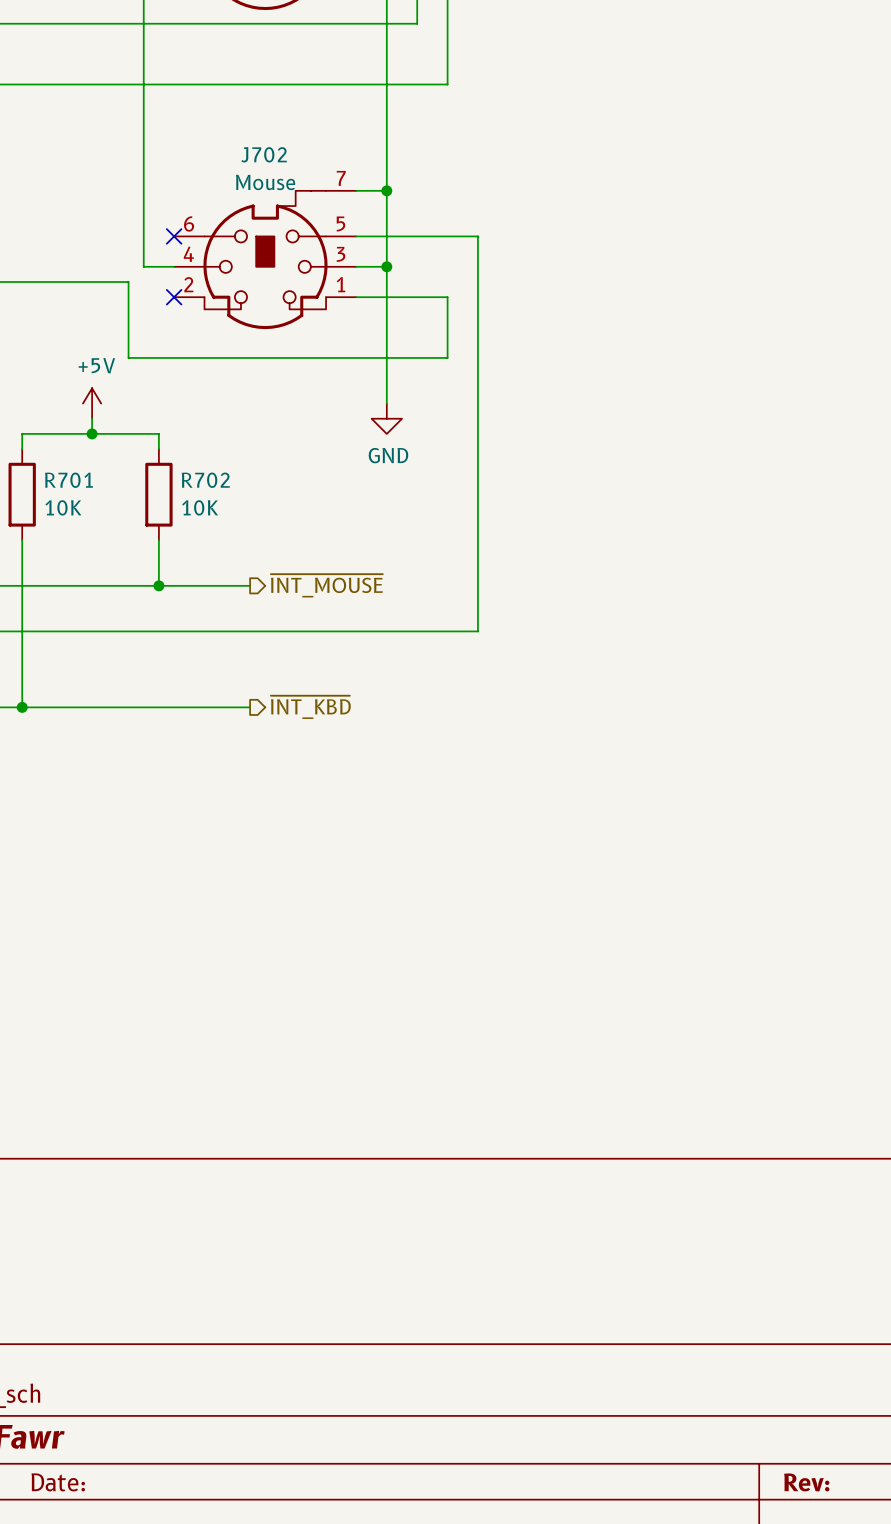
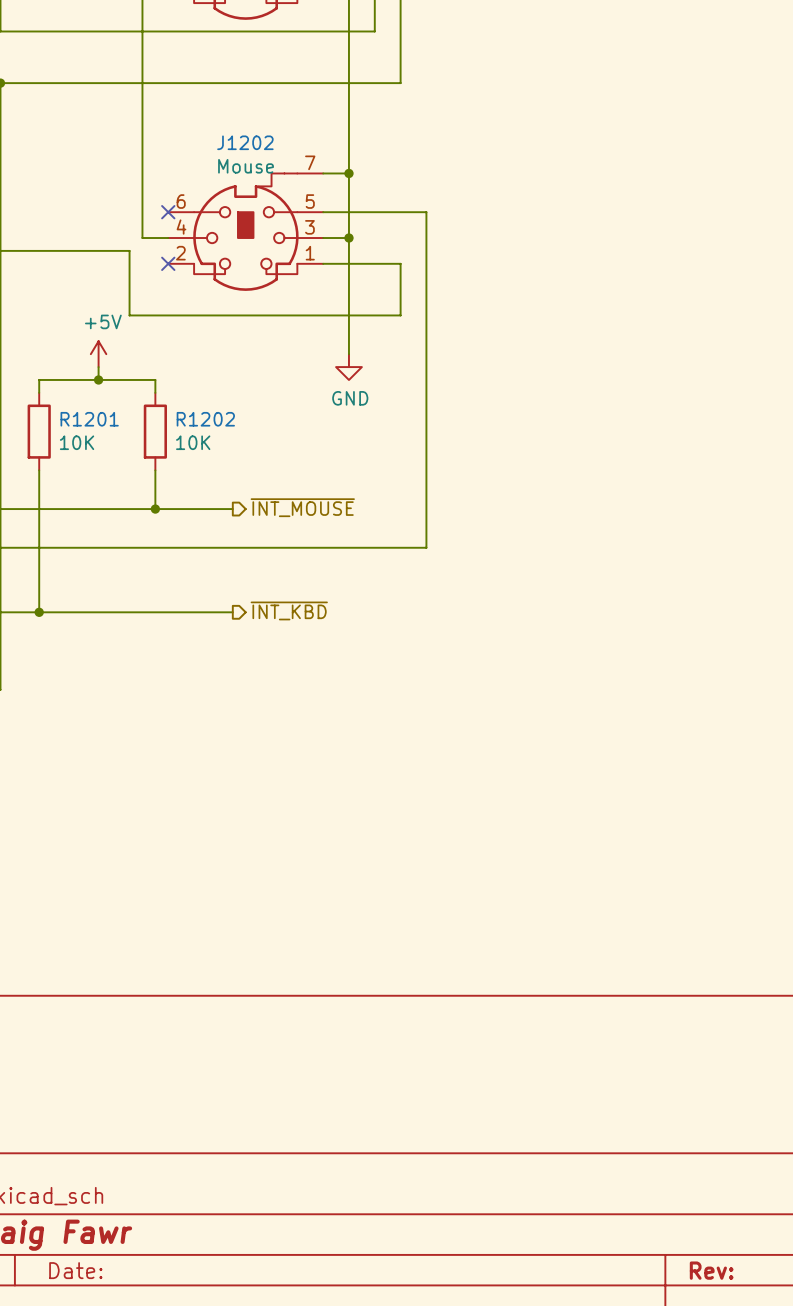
J702 name: J702 (264, 154) -> J1202 (245, 142)
R701 name: R701 (68, 480) -> R1201 (89, 419)
R702 name: R702 (205, 480) -> R1202 (205, 419)

